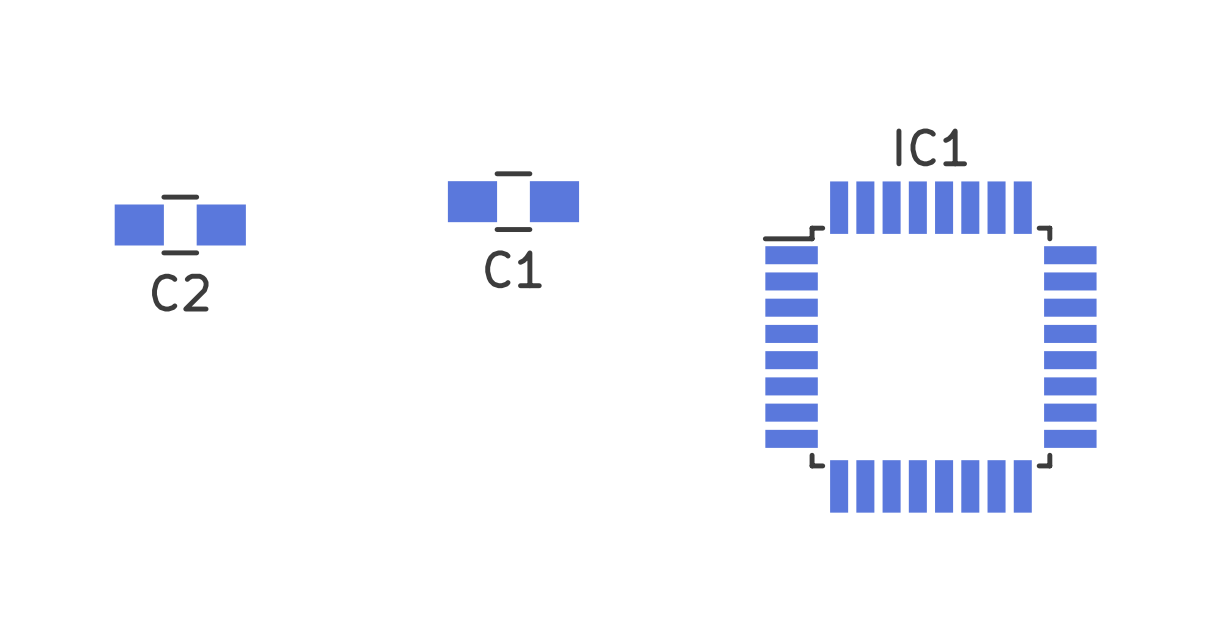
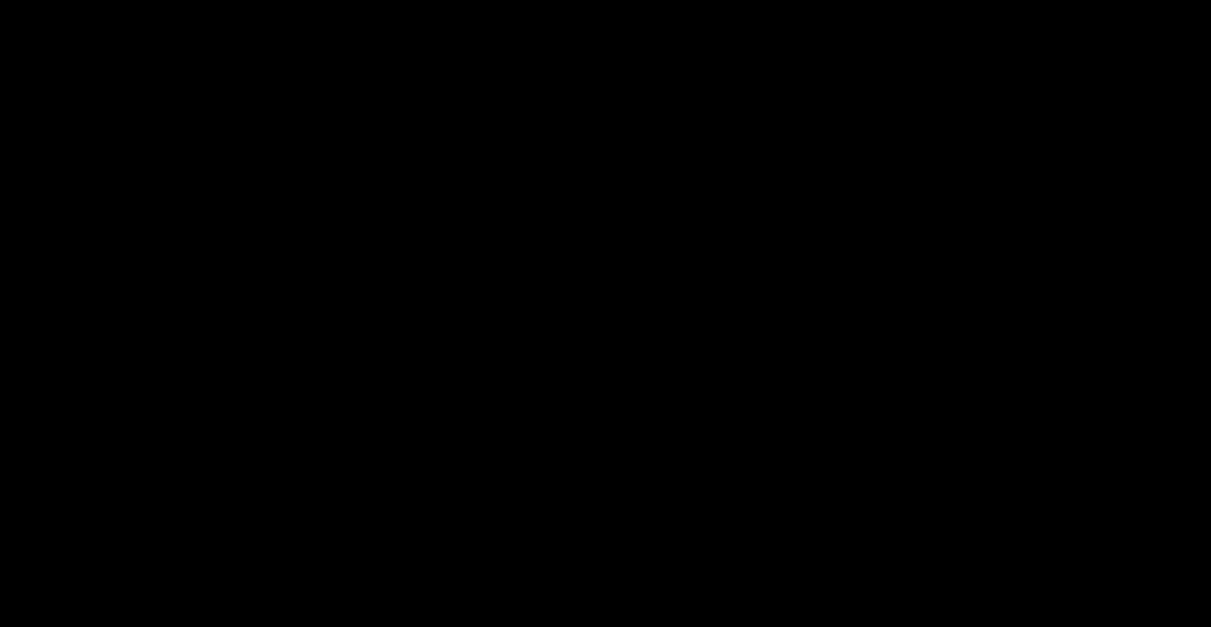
C1: (513, 201) -> none
C2: (180, 224) -> none
IC1: (929, 347) -> none

